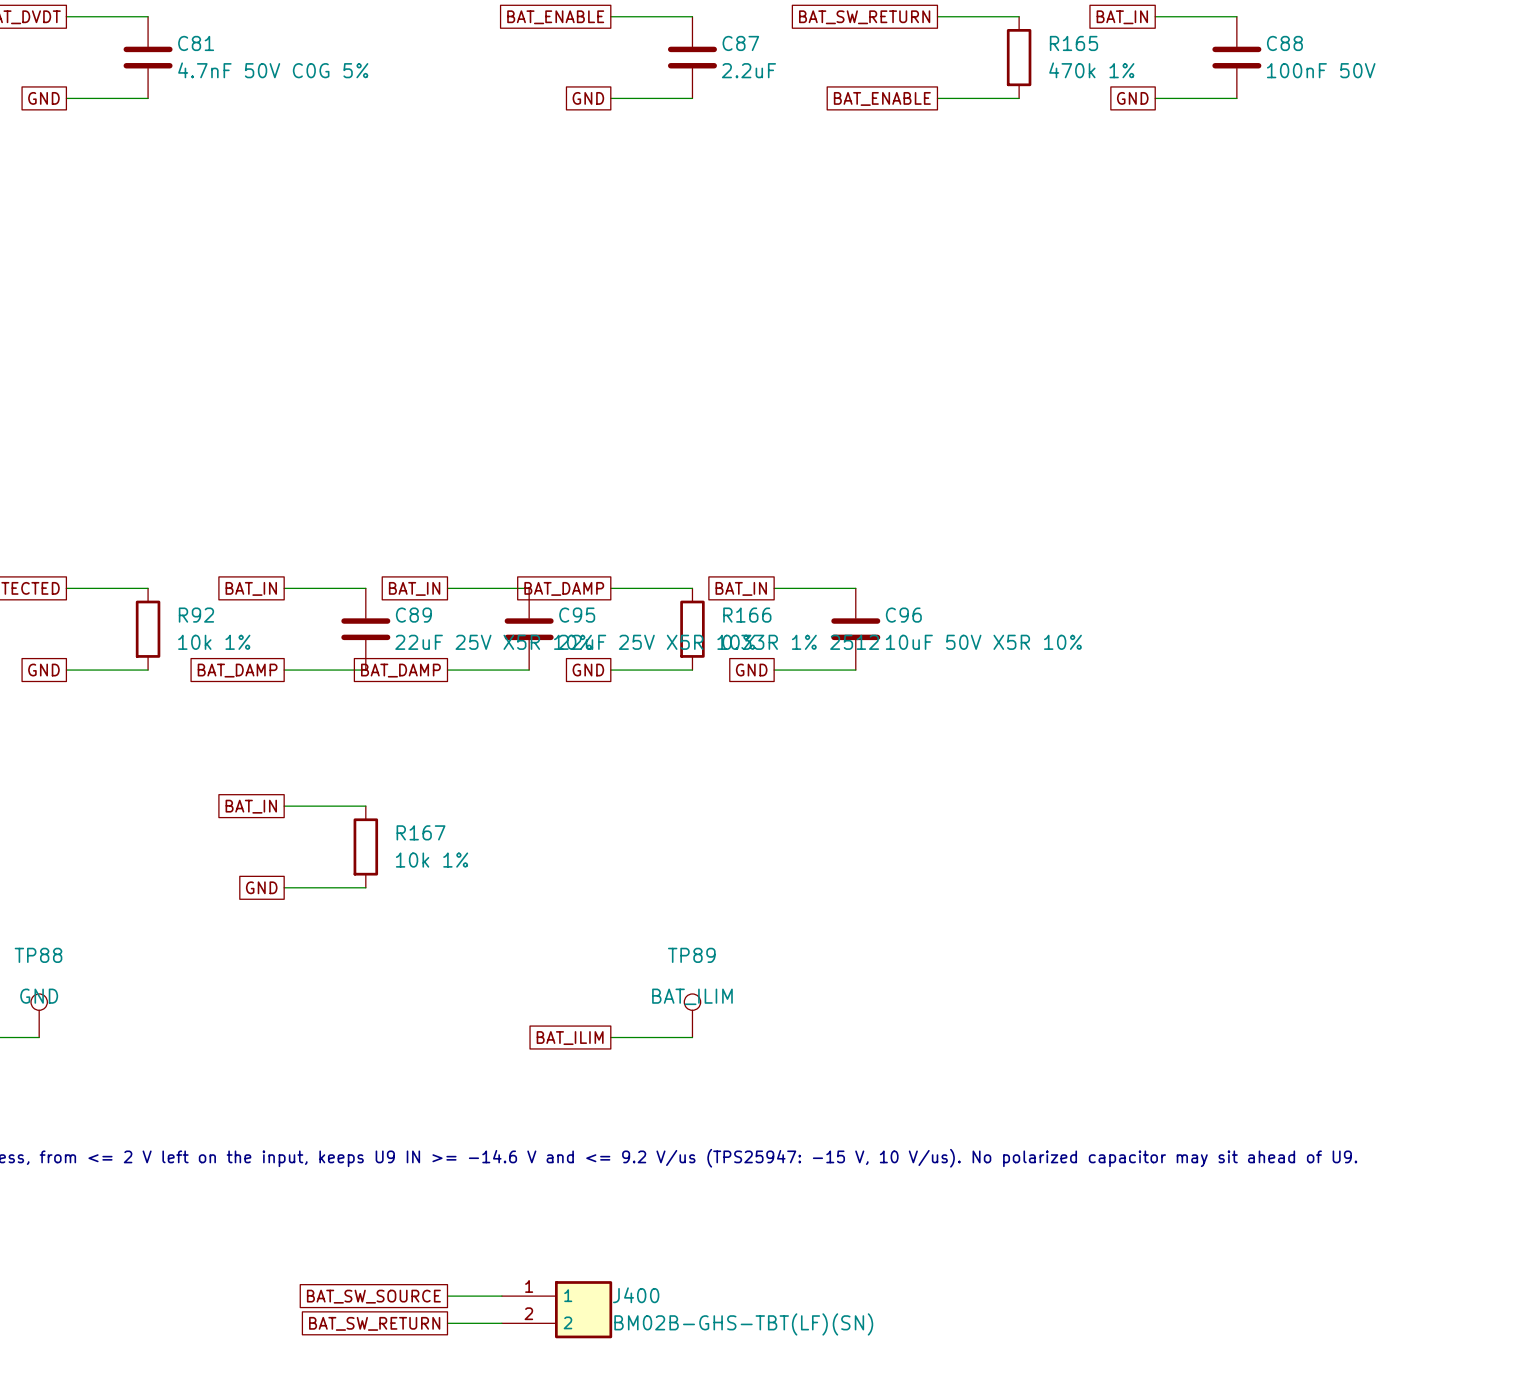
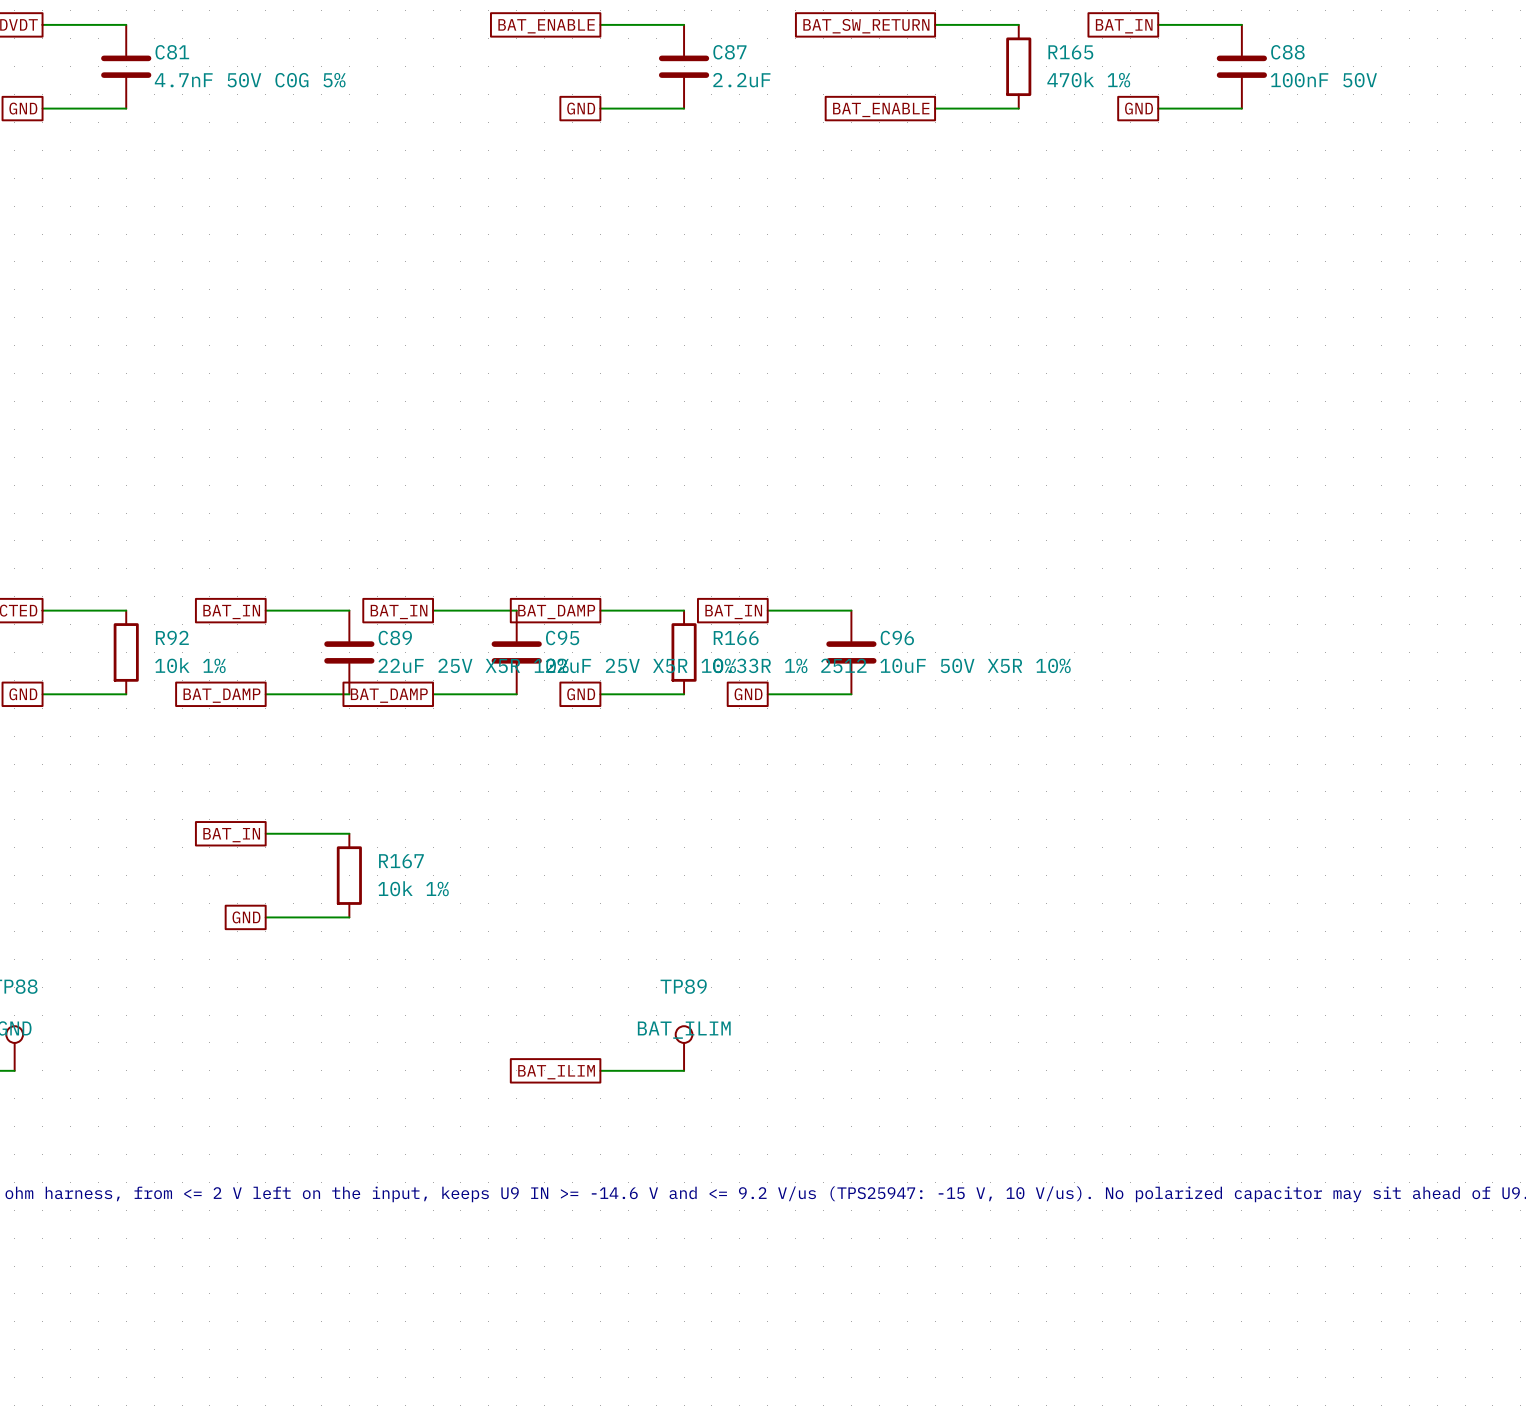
global label: BAT_SW_SOURCE (373, 1296) -> none
wire: (447, 1296) (501, 1296) -> none
J400: BM02B-GHS-TBT(LF)(SN) (557, 1309) -> none
global label: BAT_SW_RETURN (374, 1323) -> none
wire: (447, 1323) (501, 1323) -> none

